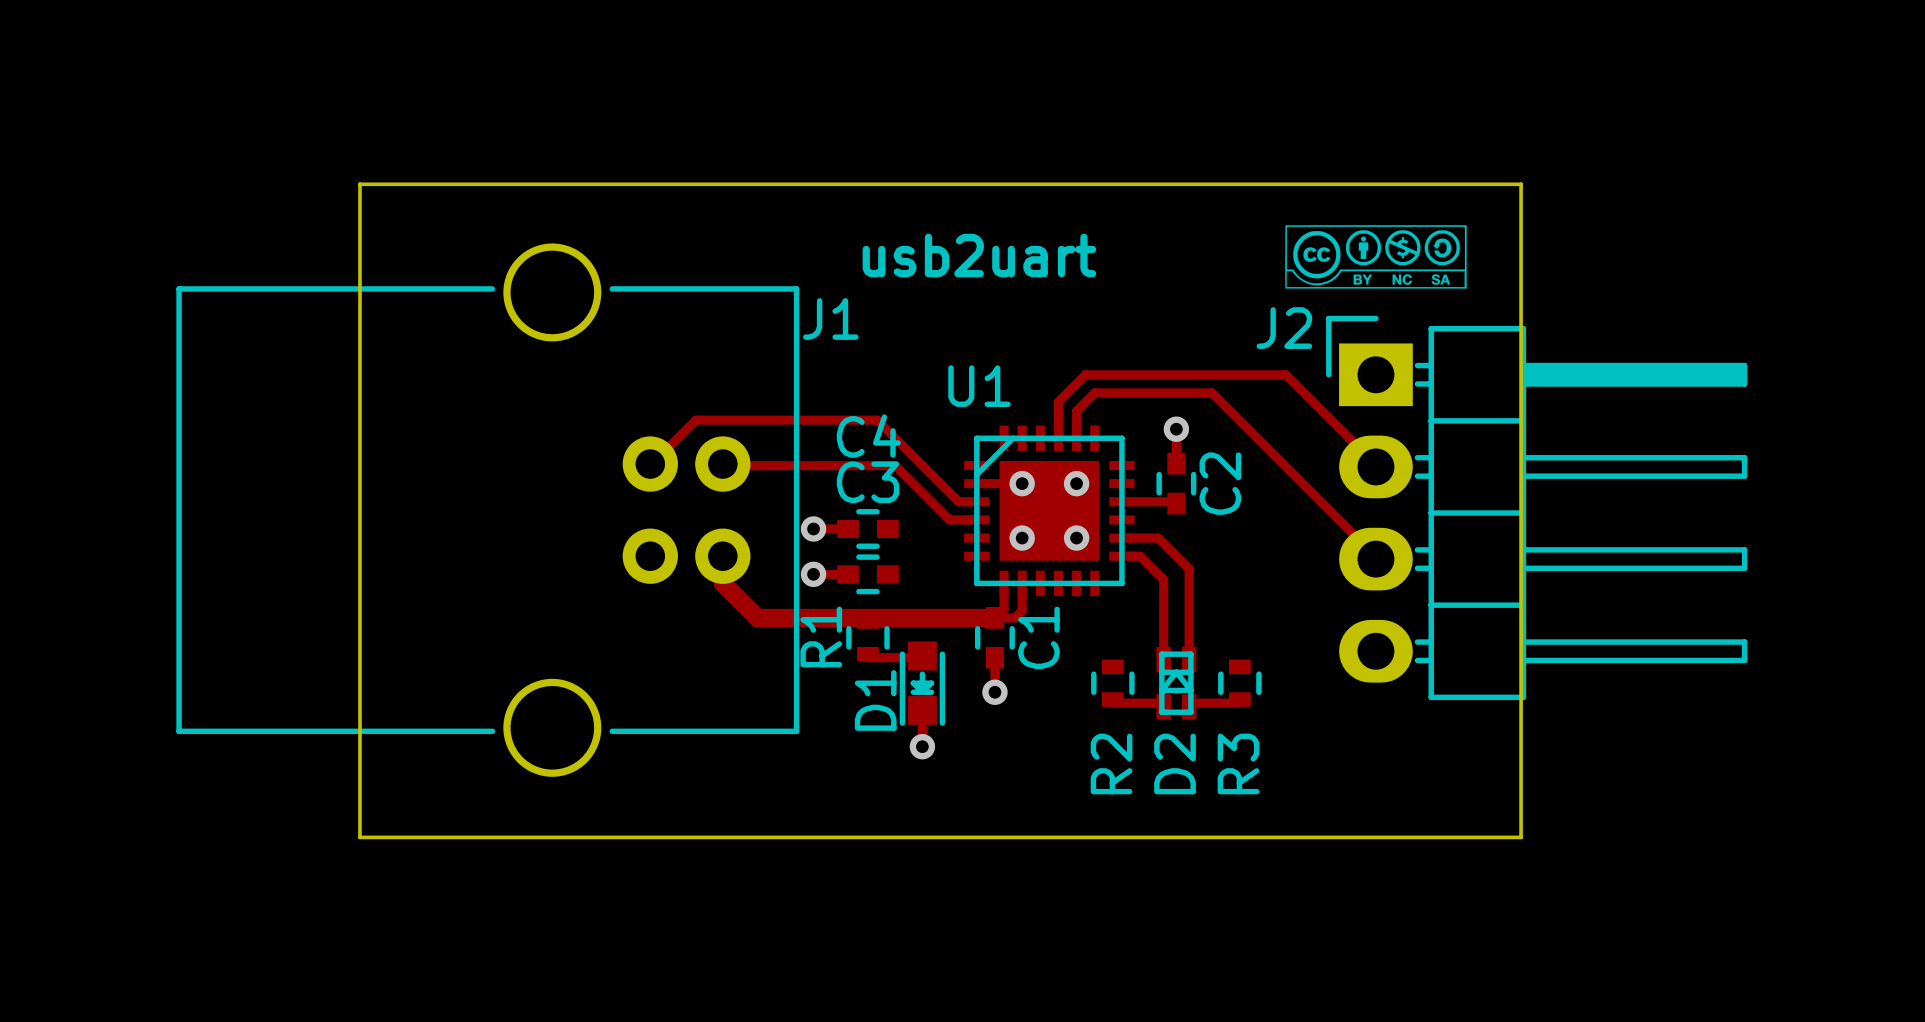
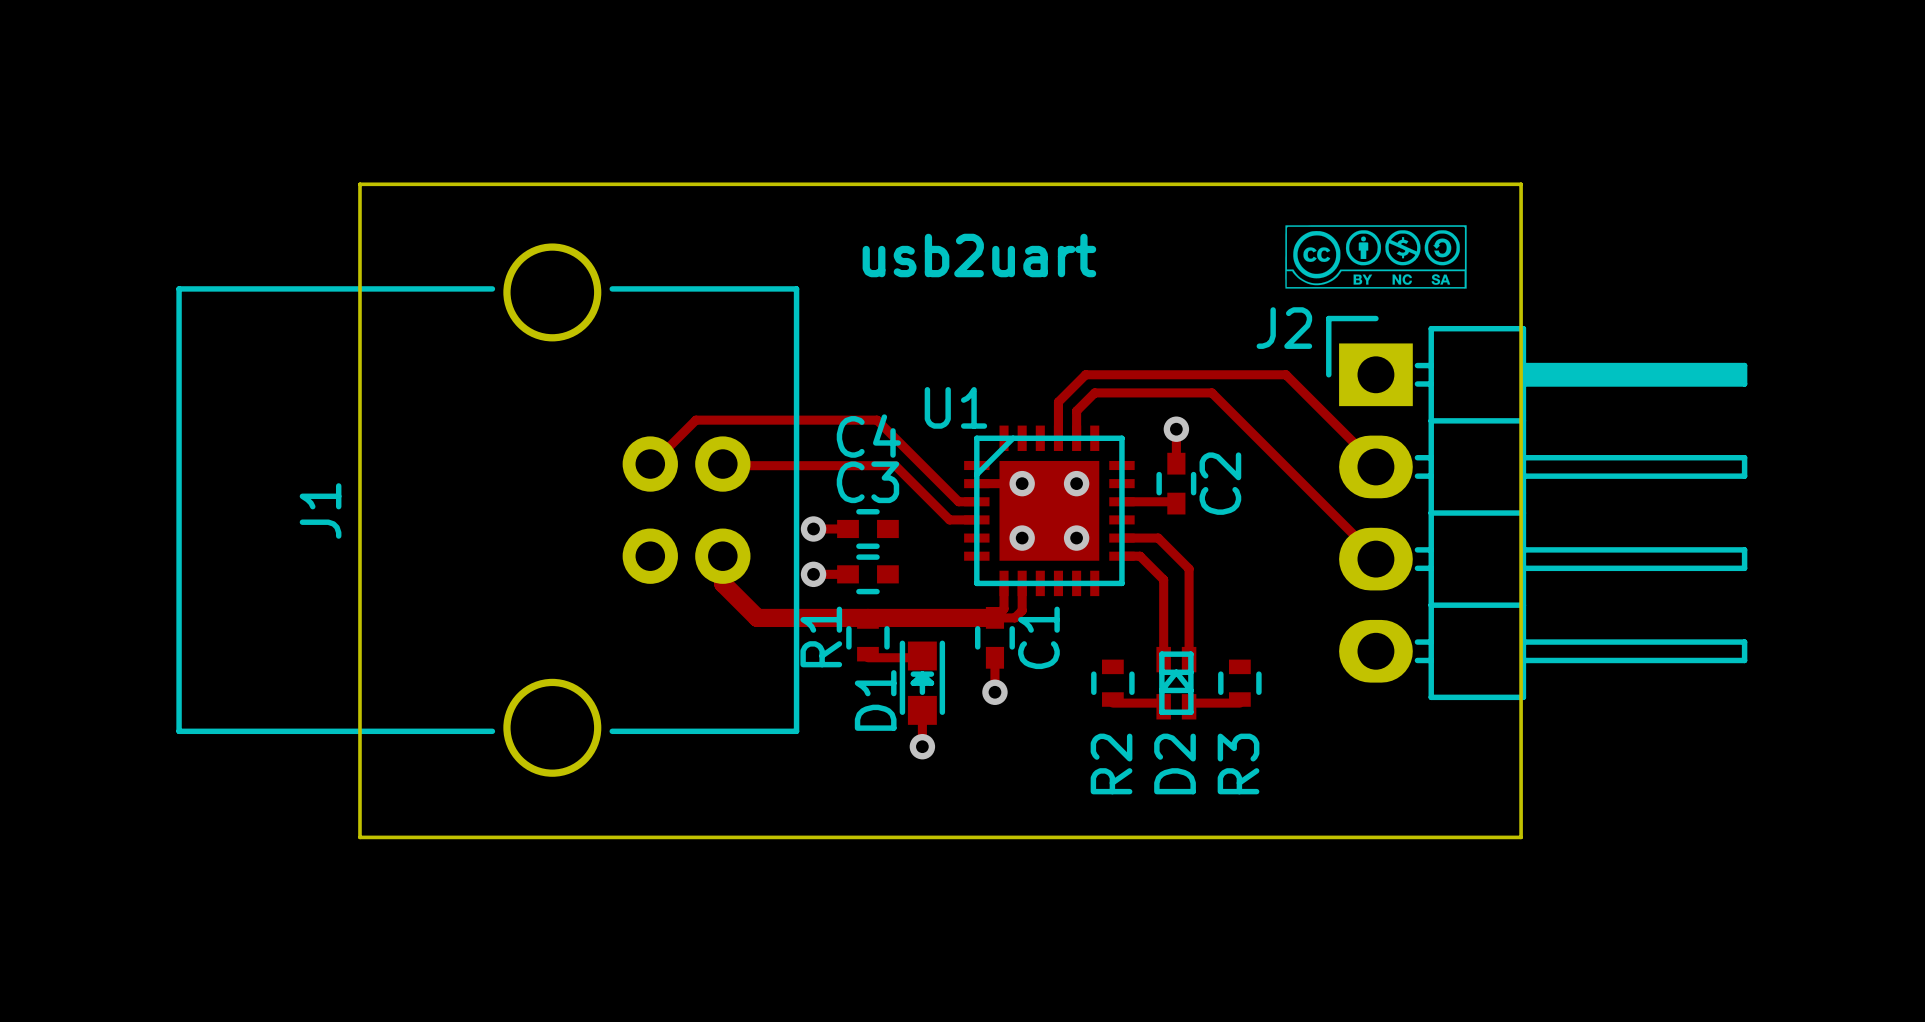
J1 name rotation: 0° (830, 319) -> 90° counterclockwise (320, 510)
J1 name position: J1 (830, 319) -> J1 (320, 510)
U1 name position: U1 (979, 386) -> U1 (955, 407)
D1 rotation: 0° (922, 683) -> 180° (922, 682)

